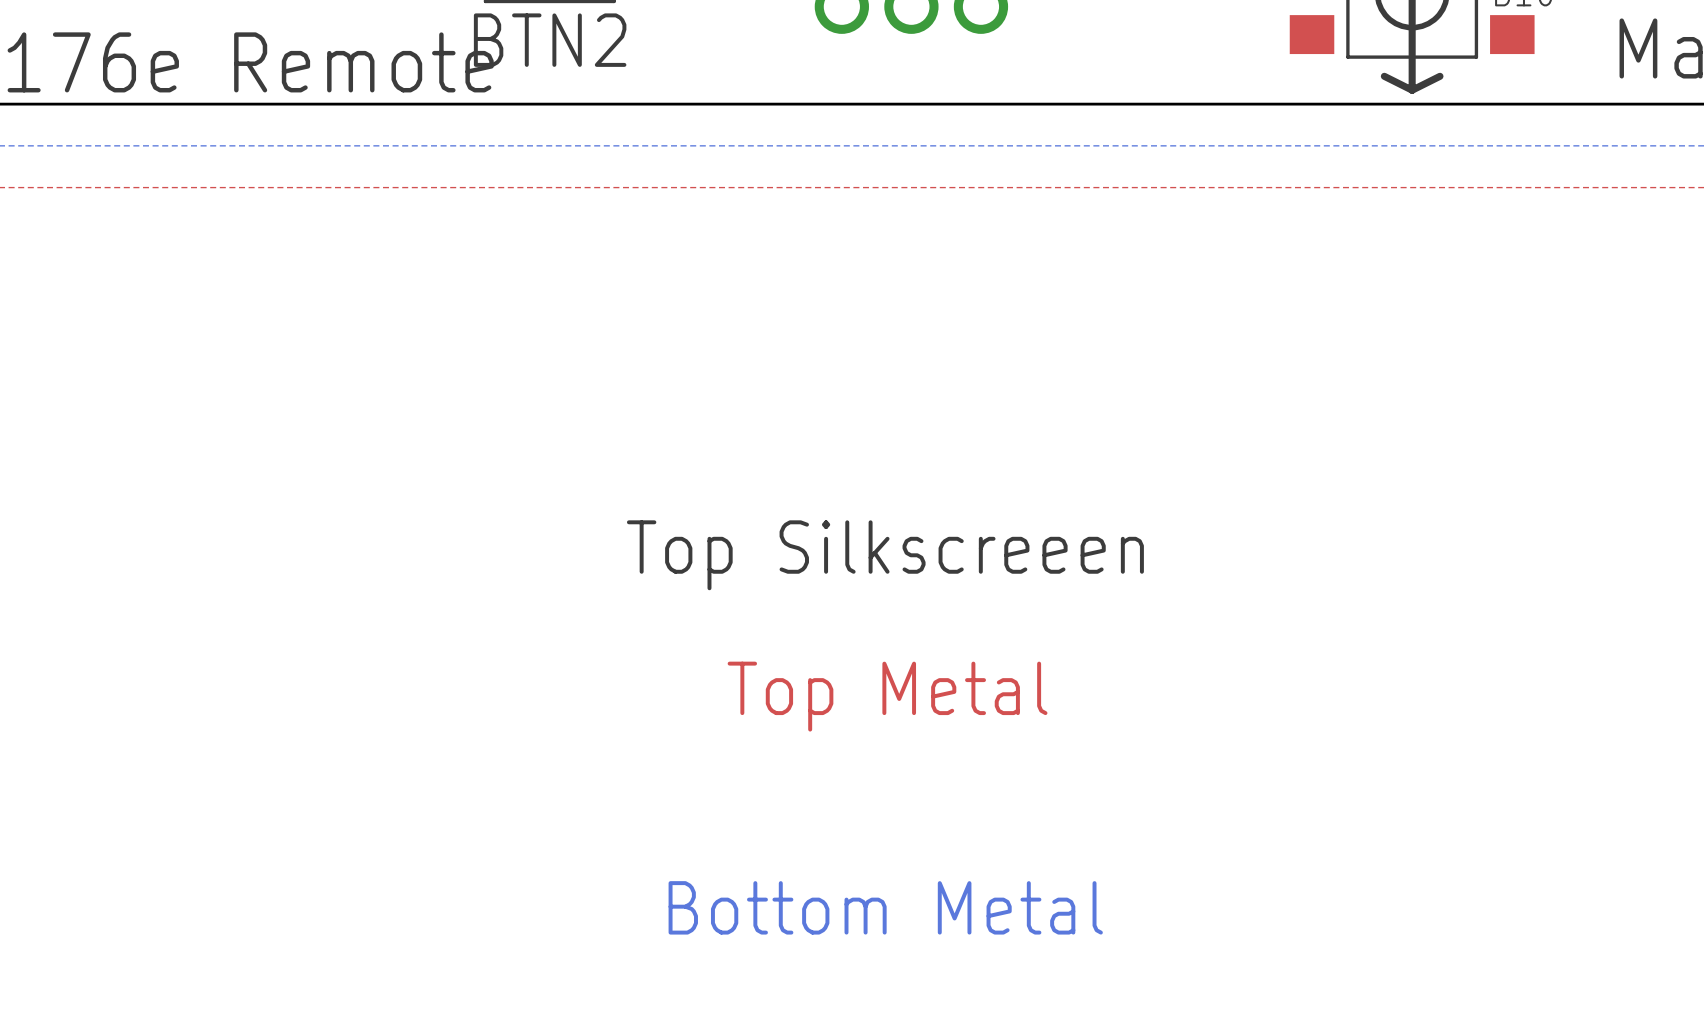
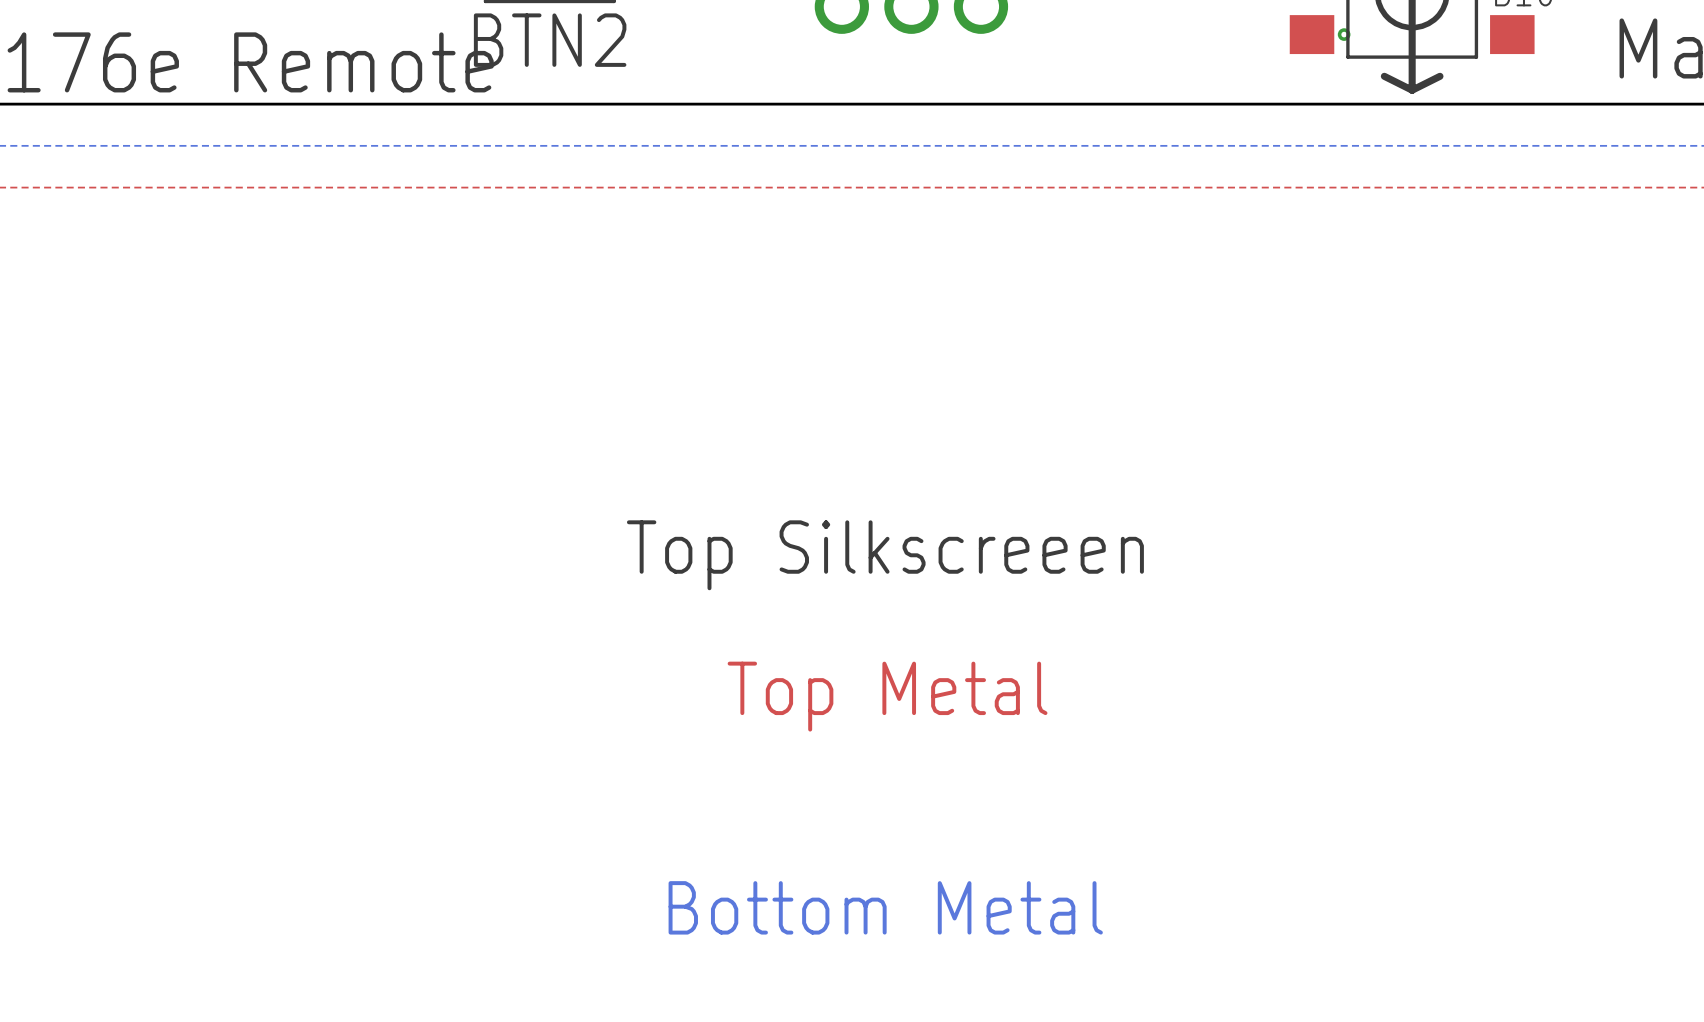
via: none -> (1344, 34)

